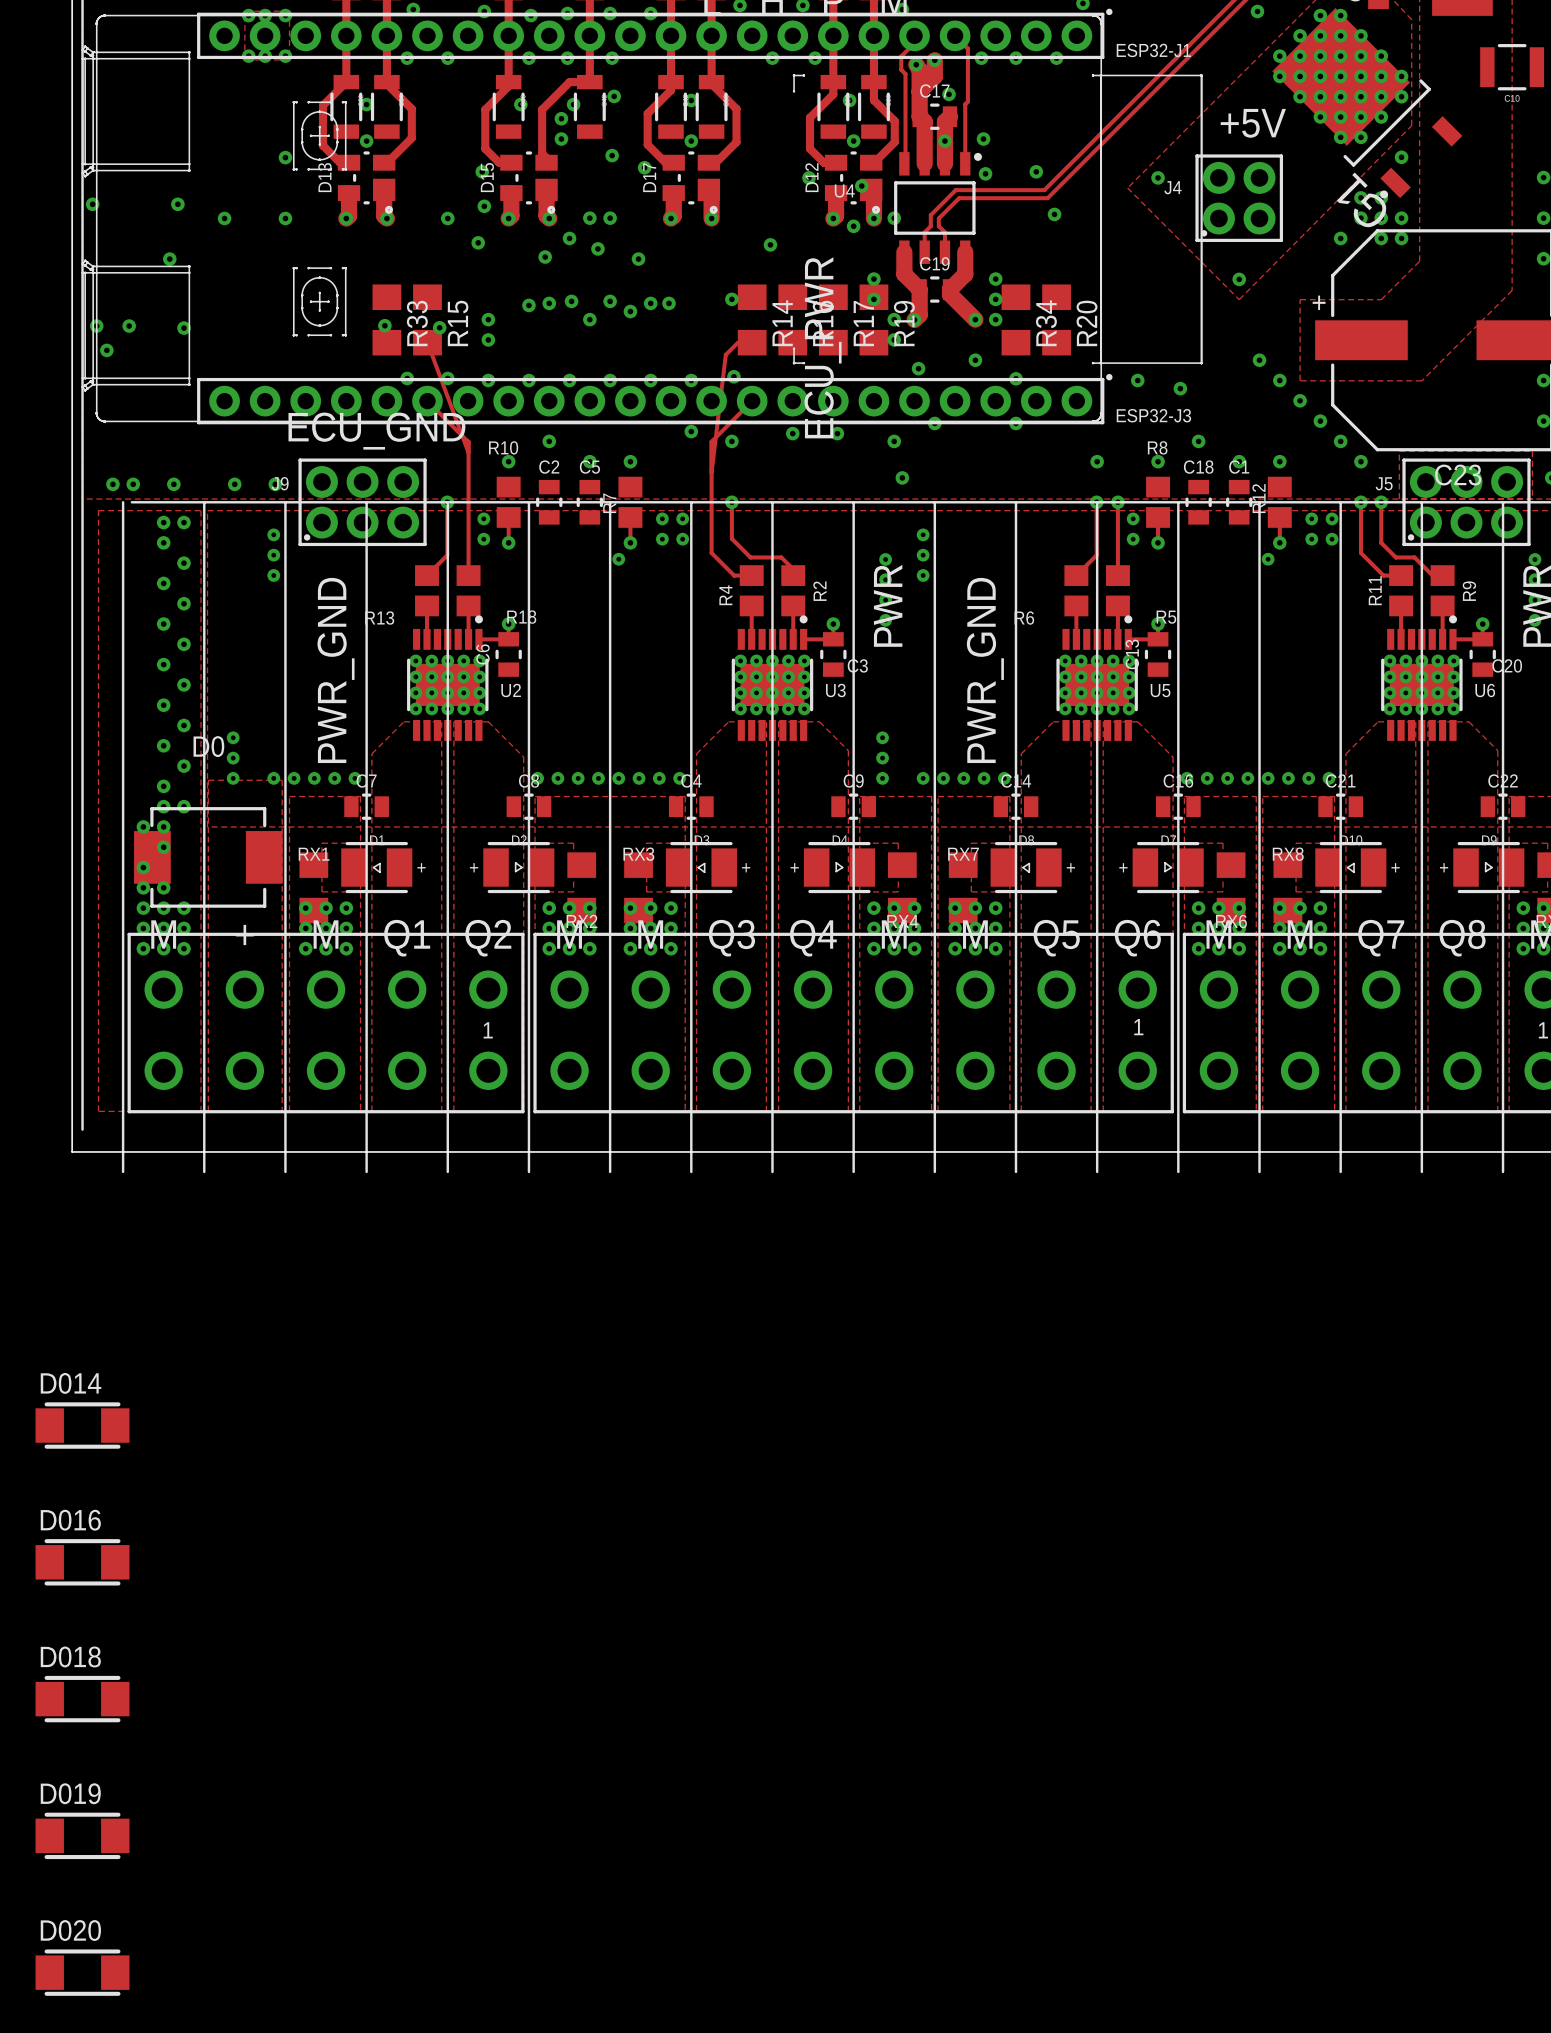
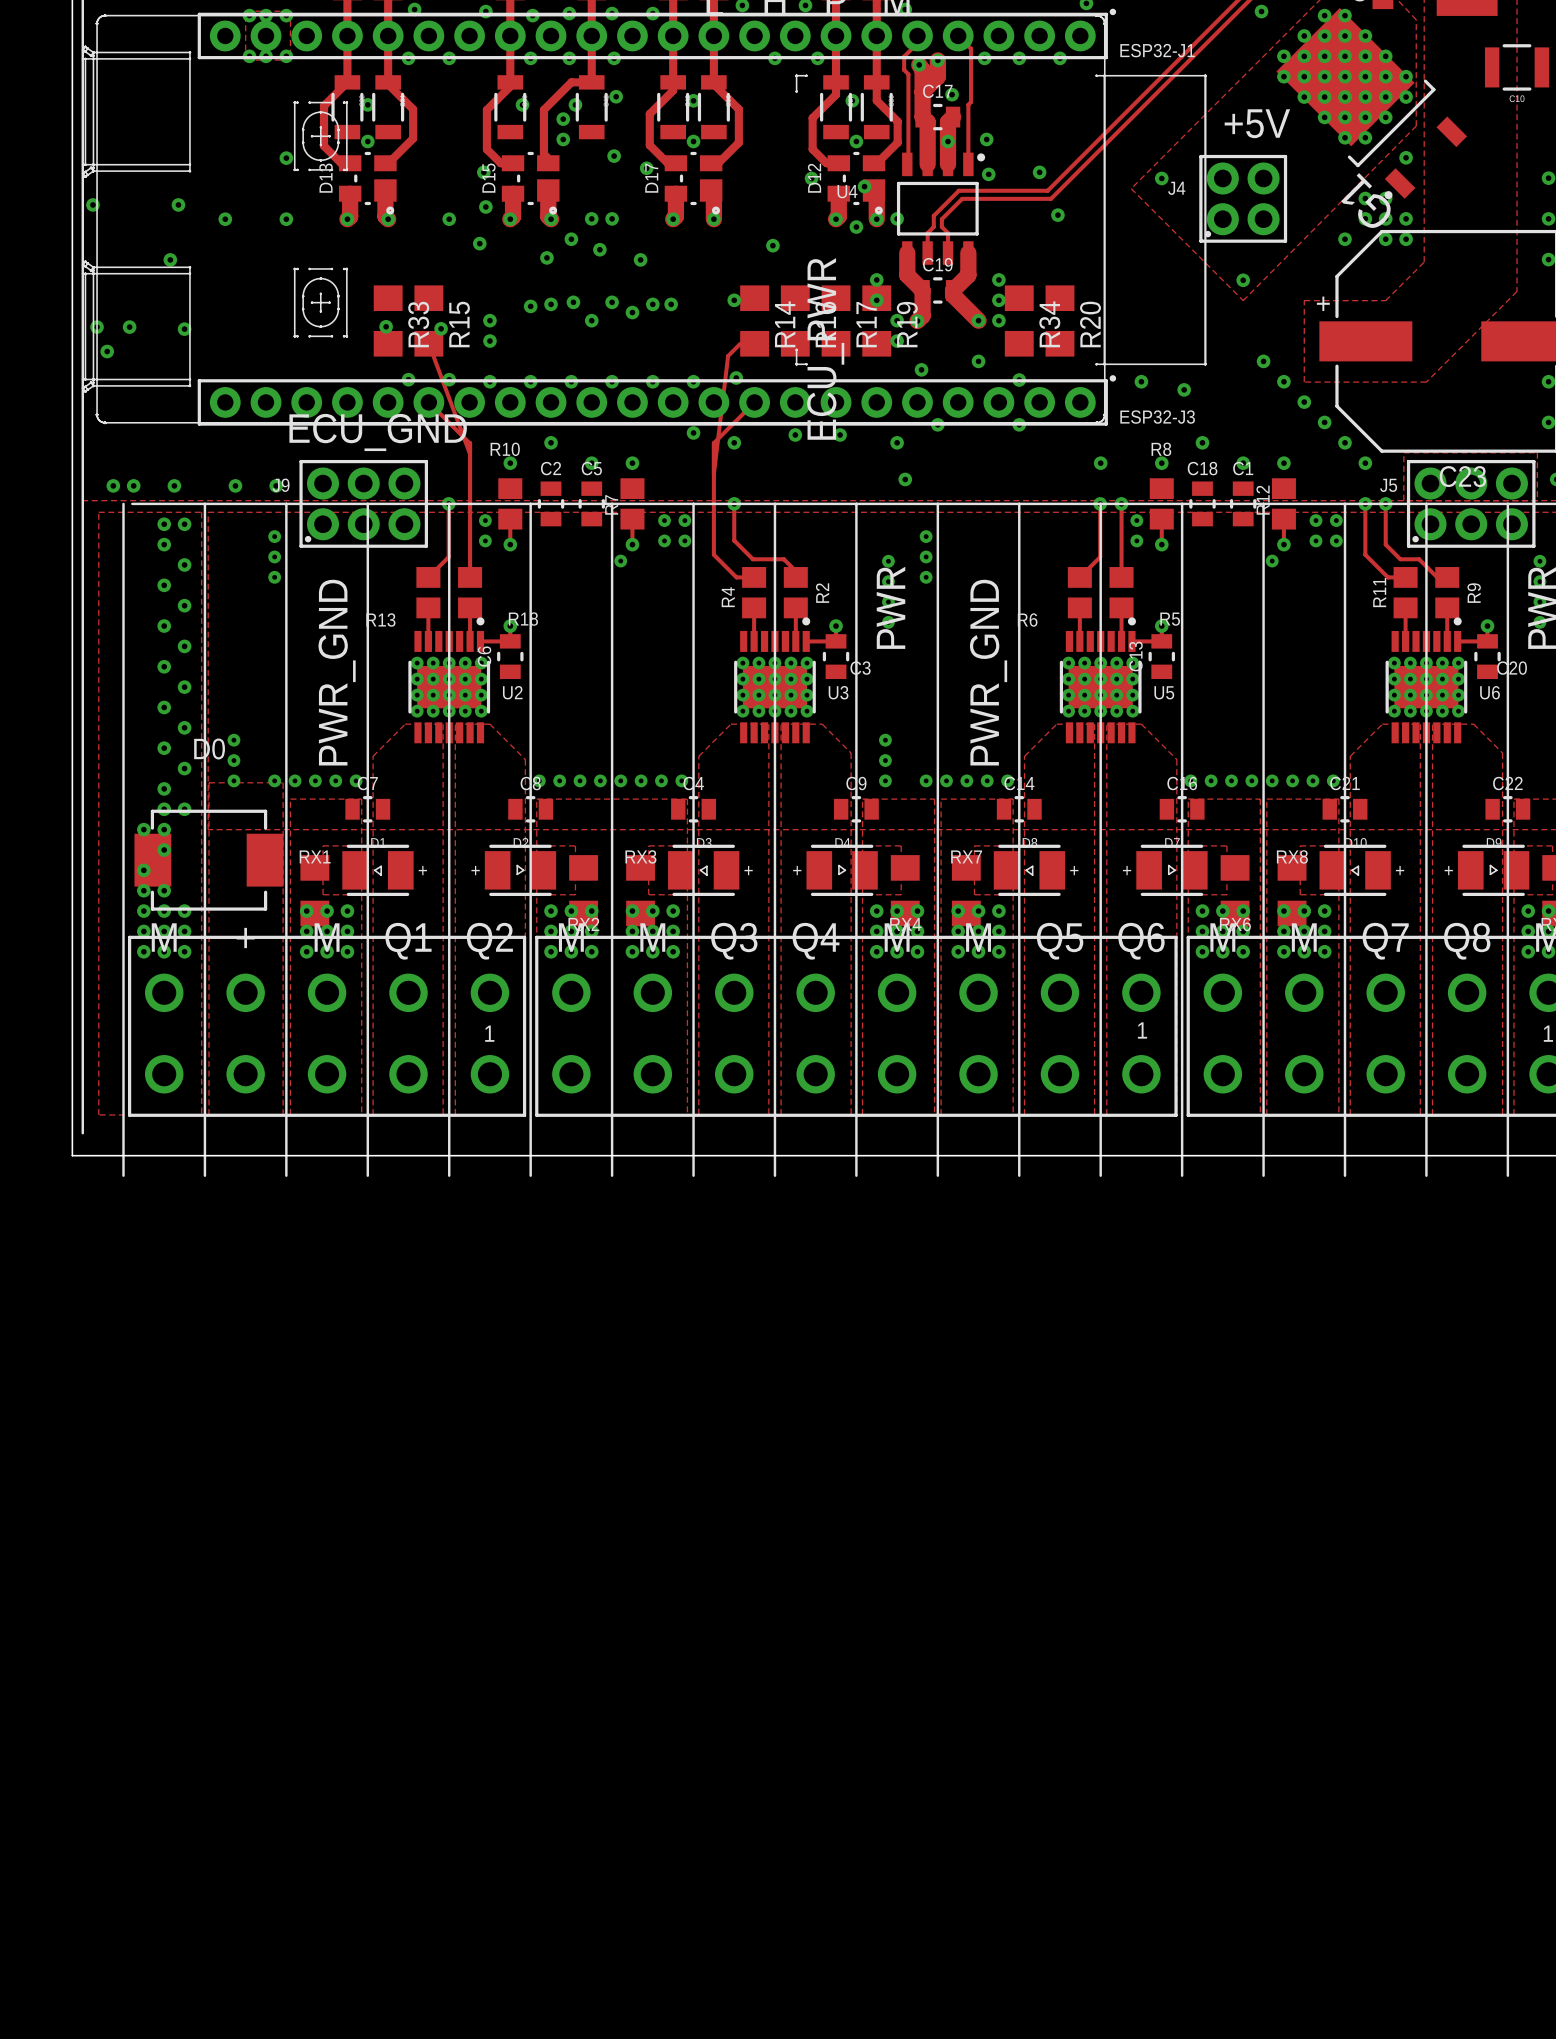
D014: (82, 1425) -> none
D016: (82, 1562) -> none
D018: (82, 1699) -> none
D019: (82, 1835) -> none
D020: (82, 1972) -> none

